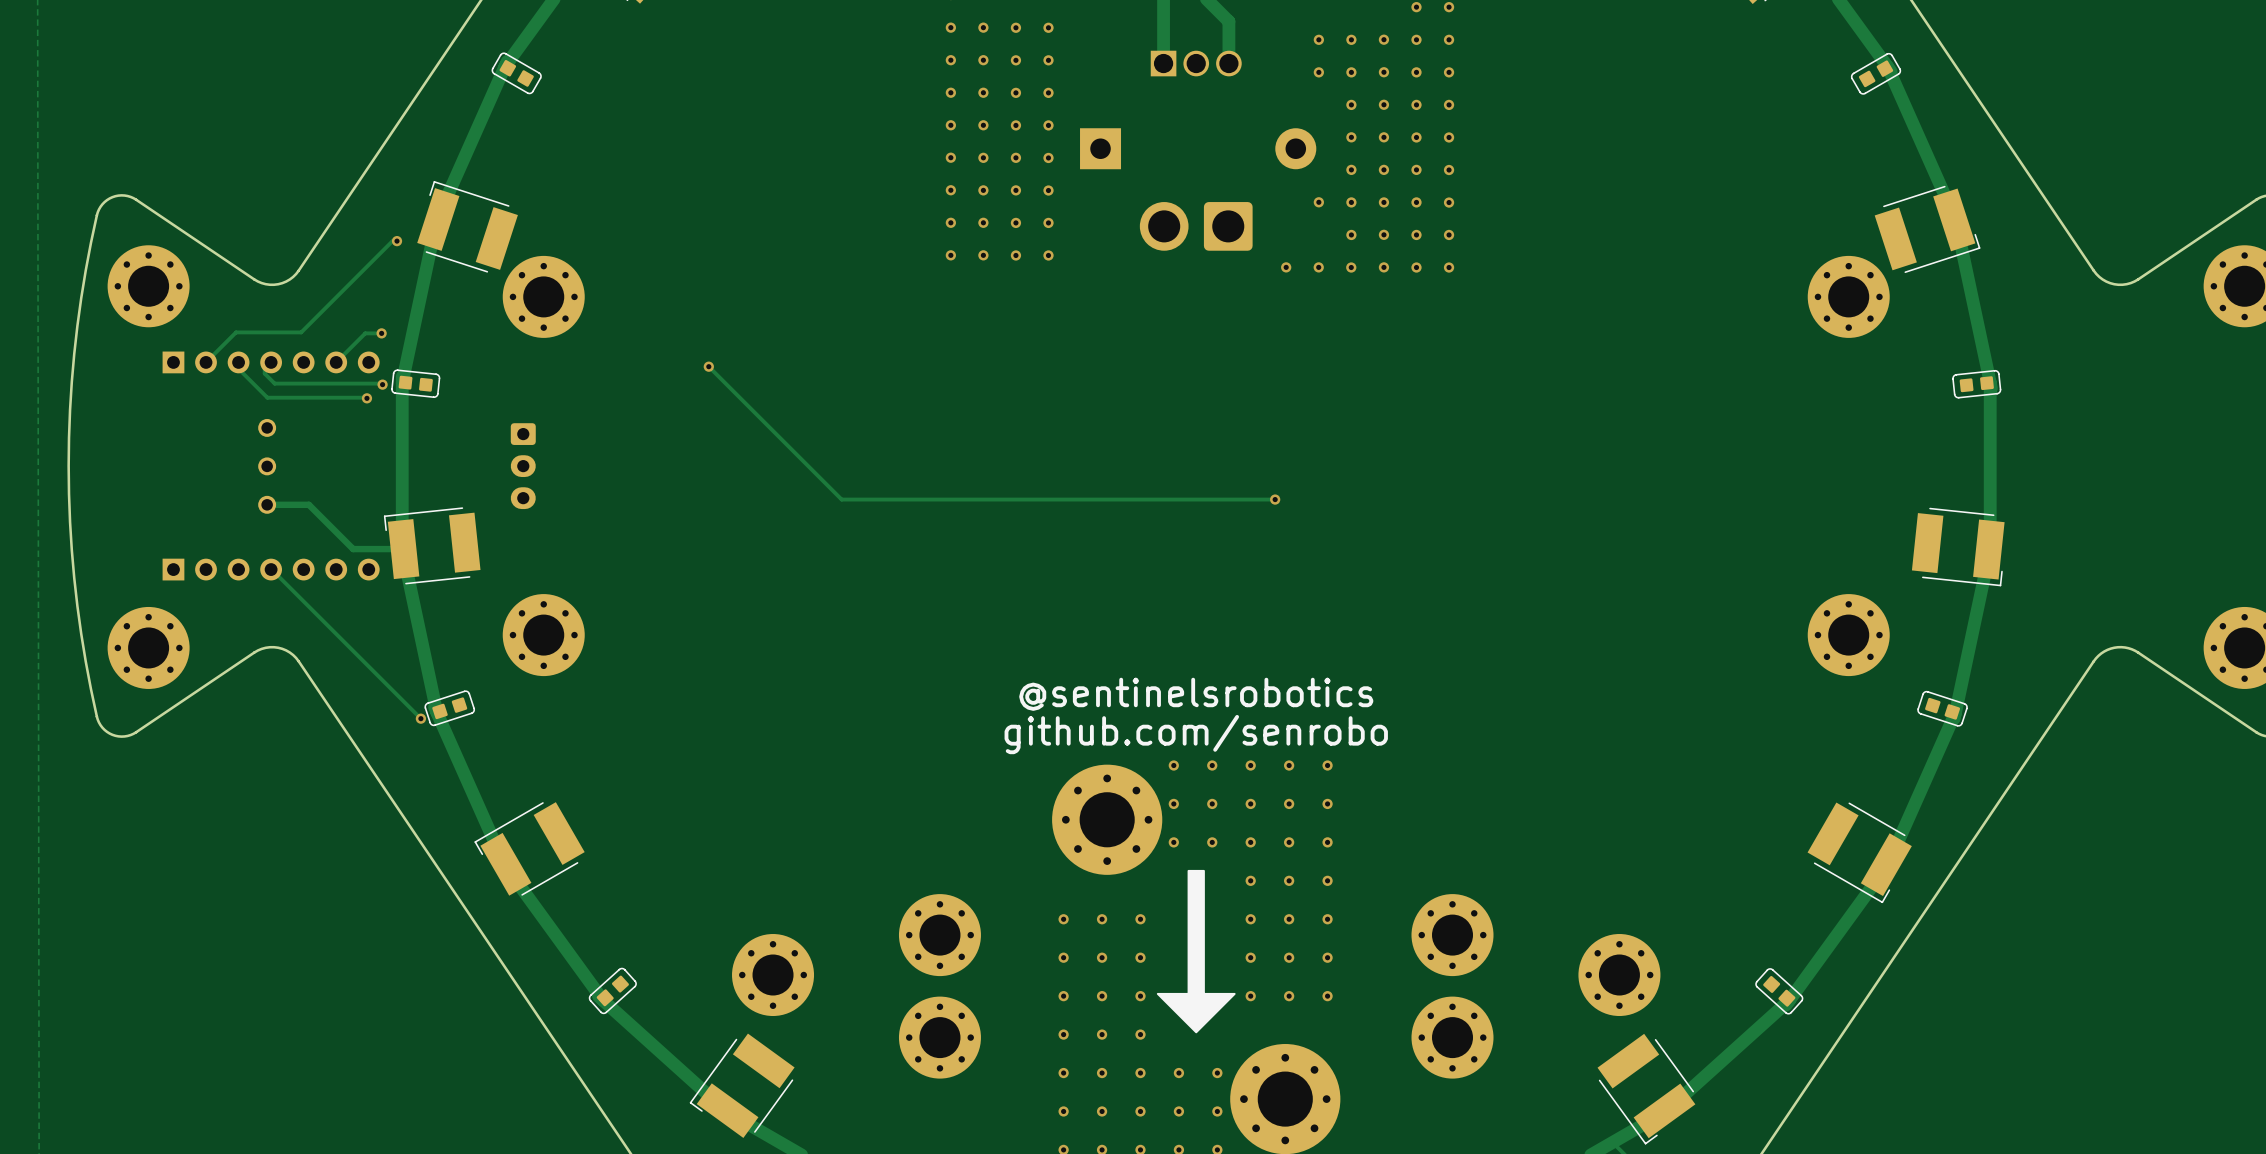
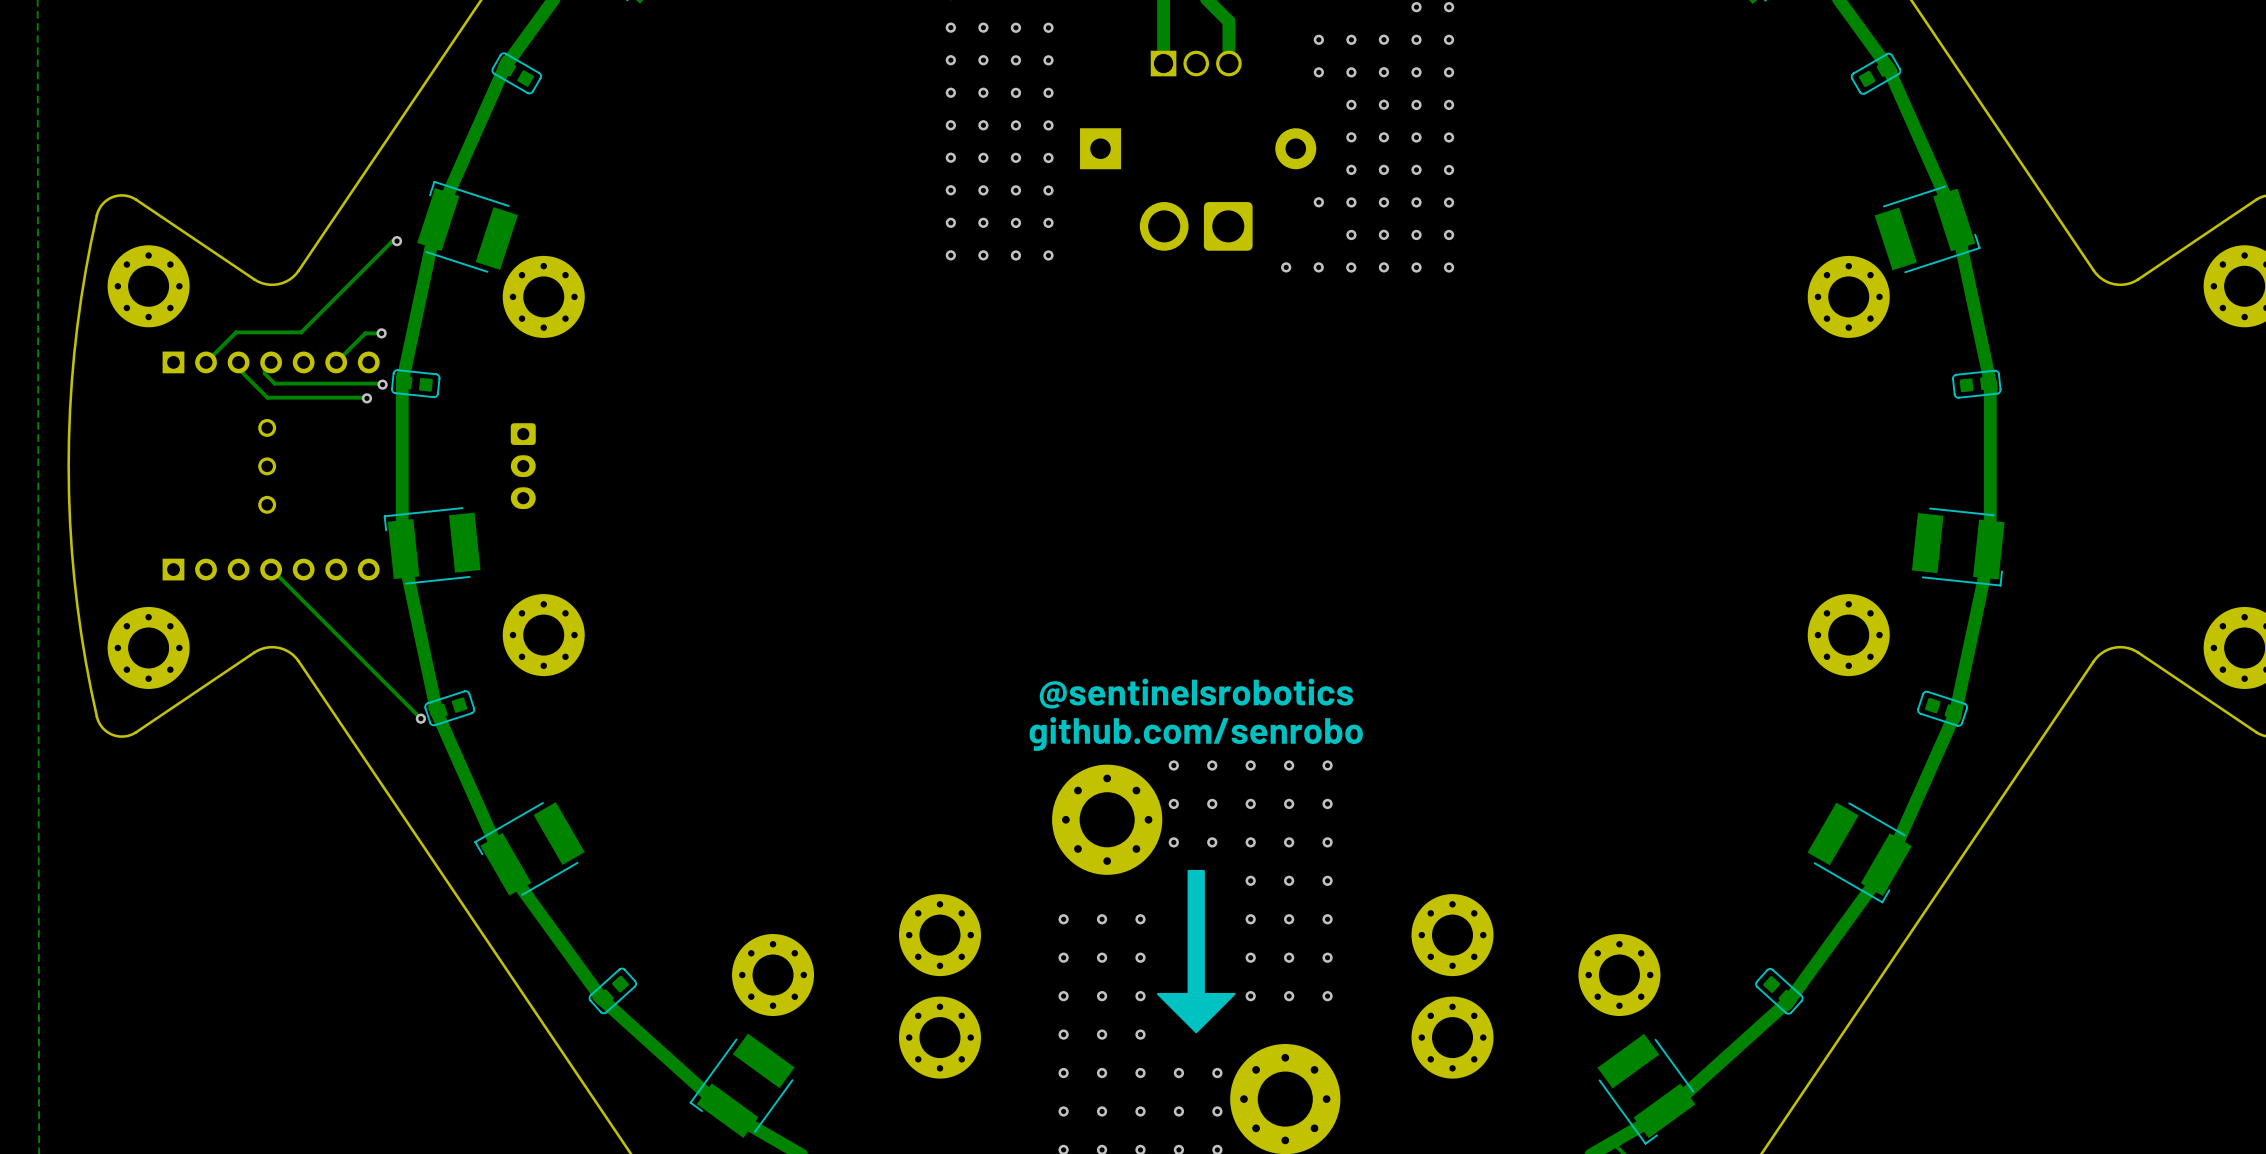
track: (708, 366) (841, 499) (1275, 499) -> none
via: (708, 366) -> none
via: (1275, 499) -> none
track: (267, 504) (308, 504) (353, 549) (403, 549) -> none

